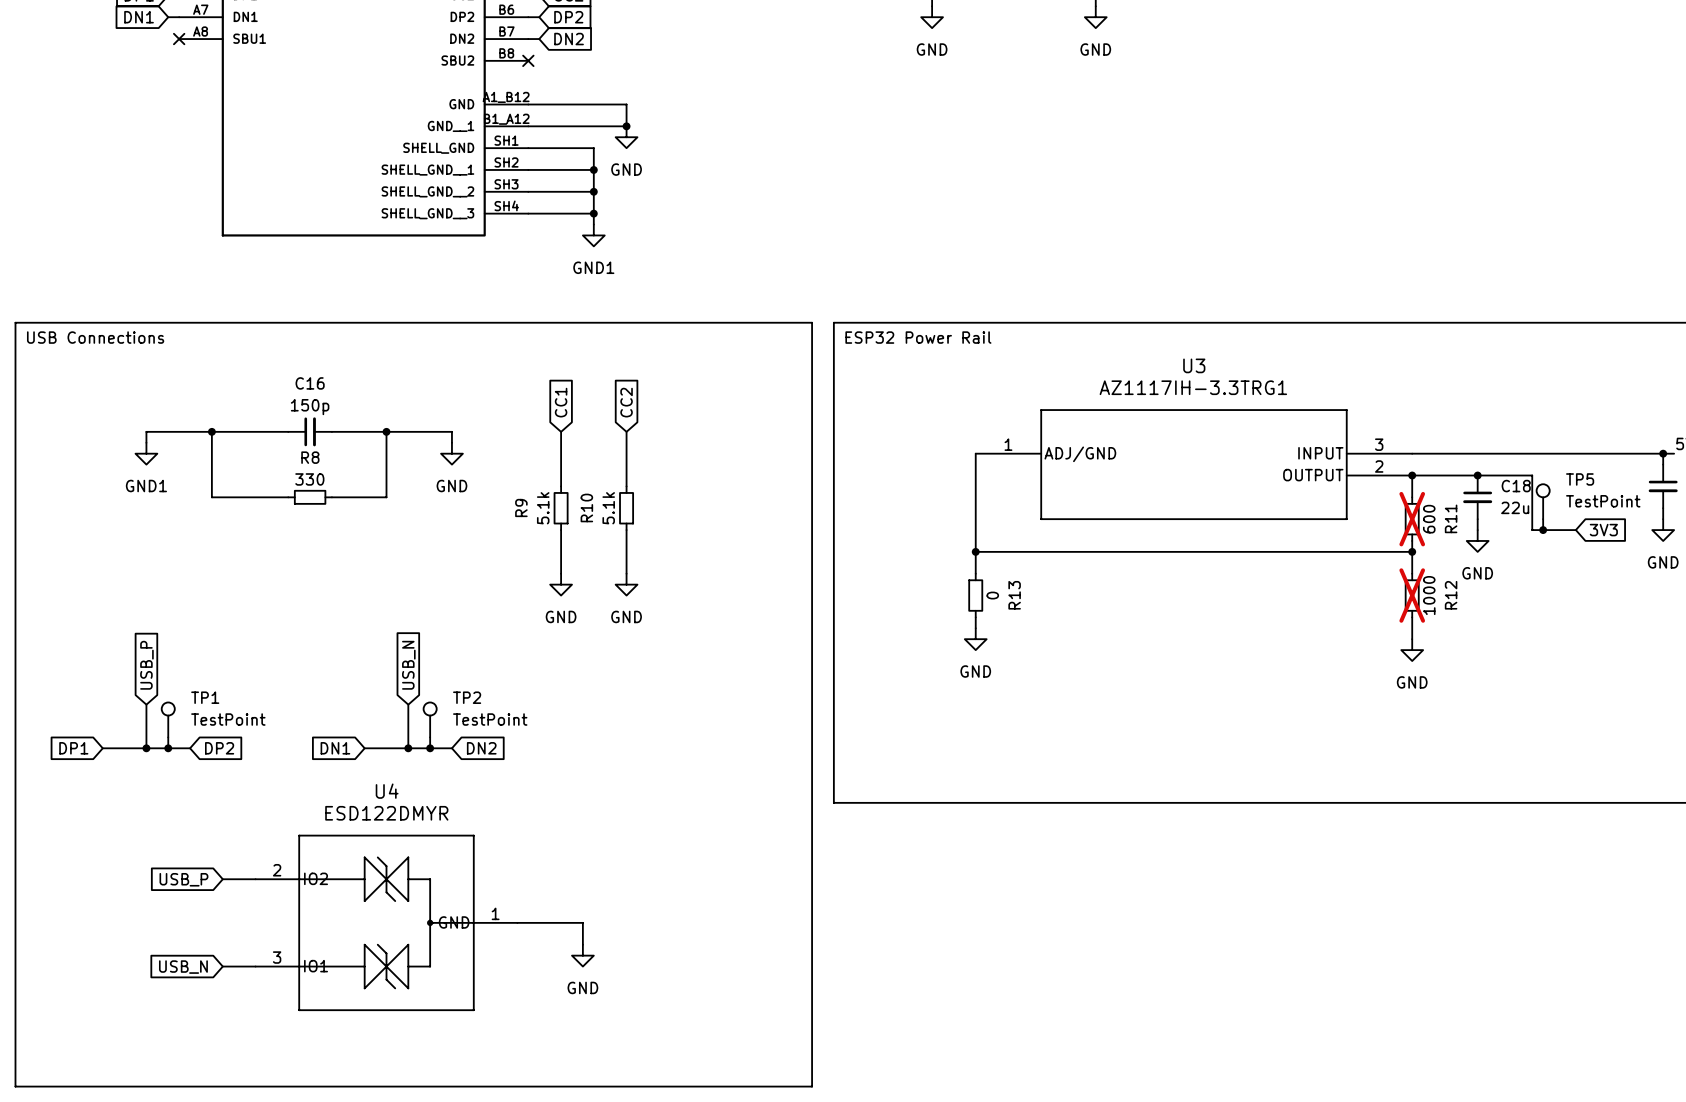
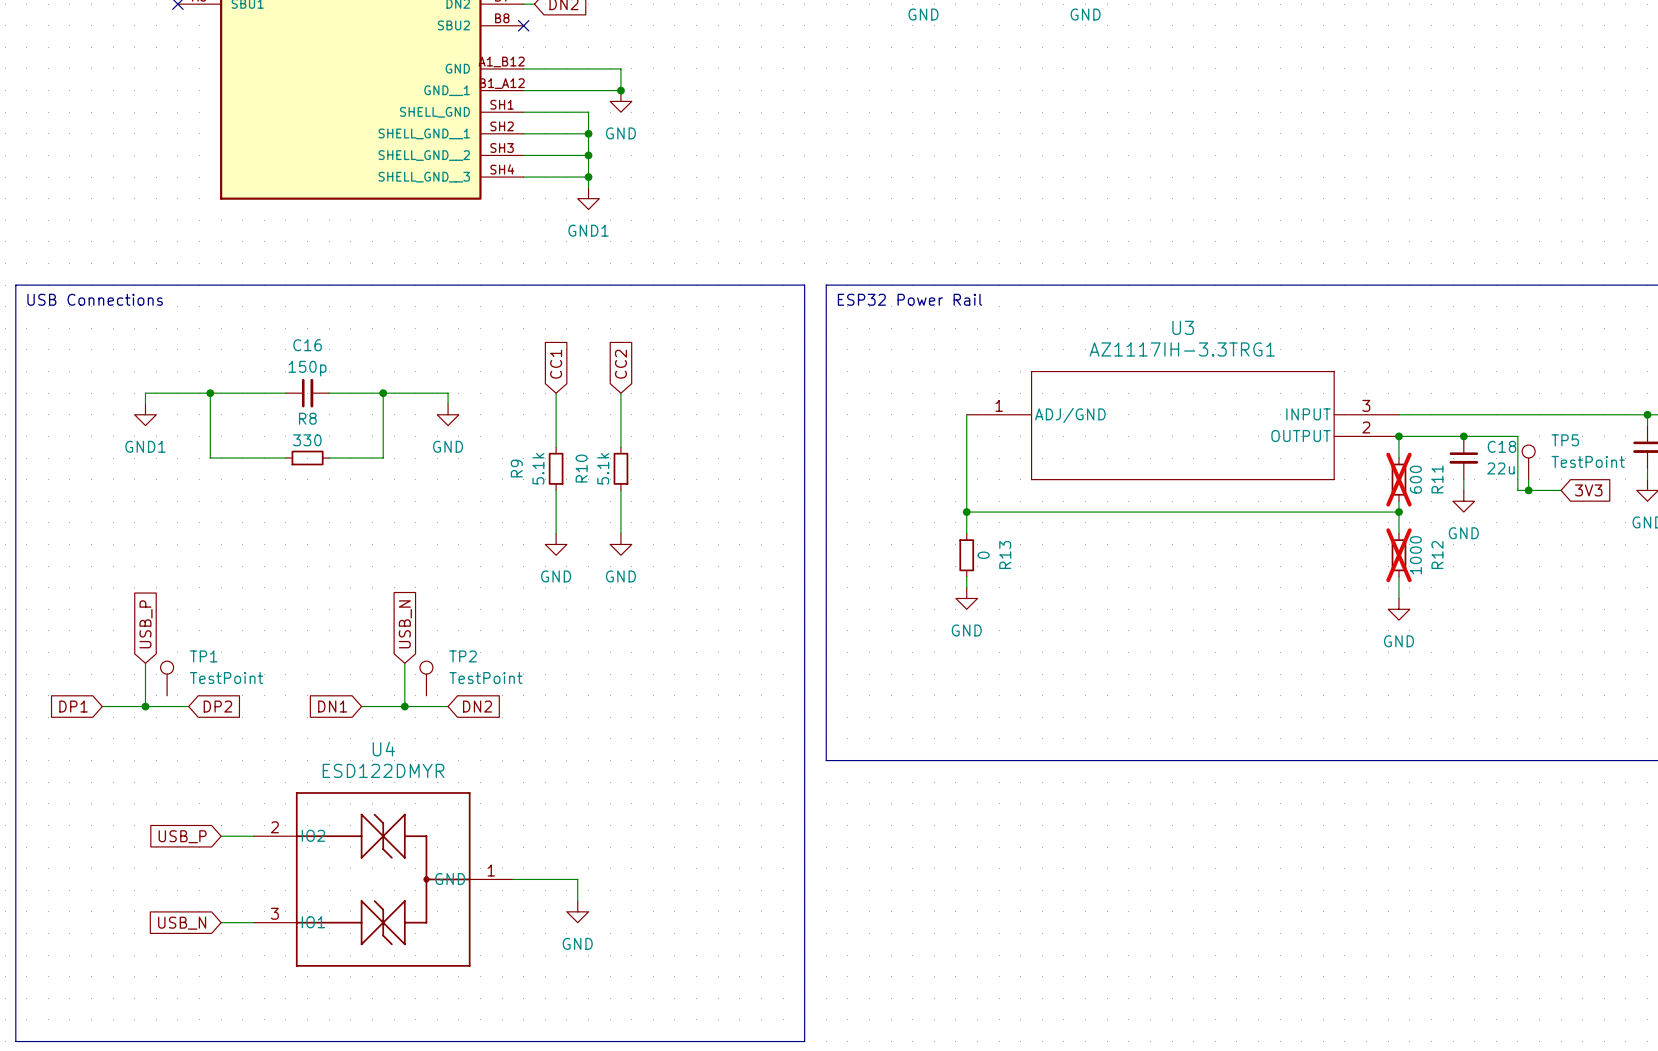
wire: (168, 737) (168, 748) -> none
wire: (430, 737) (430, 748) -> none
junction: (168, 748) -> none
junction: (430, 748) -> none

